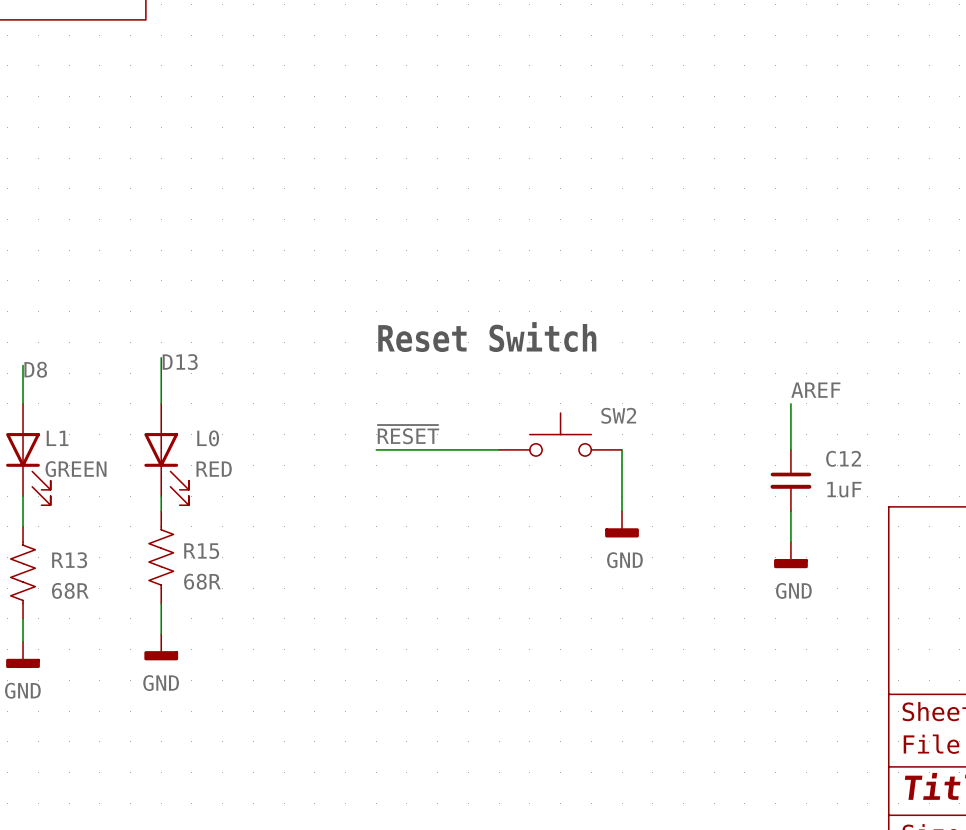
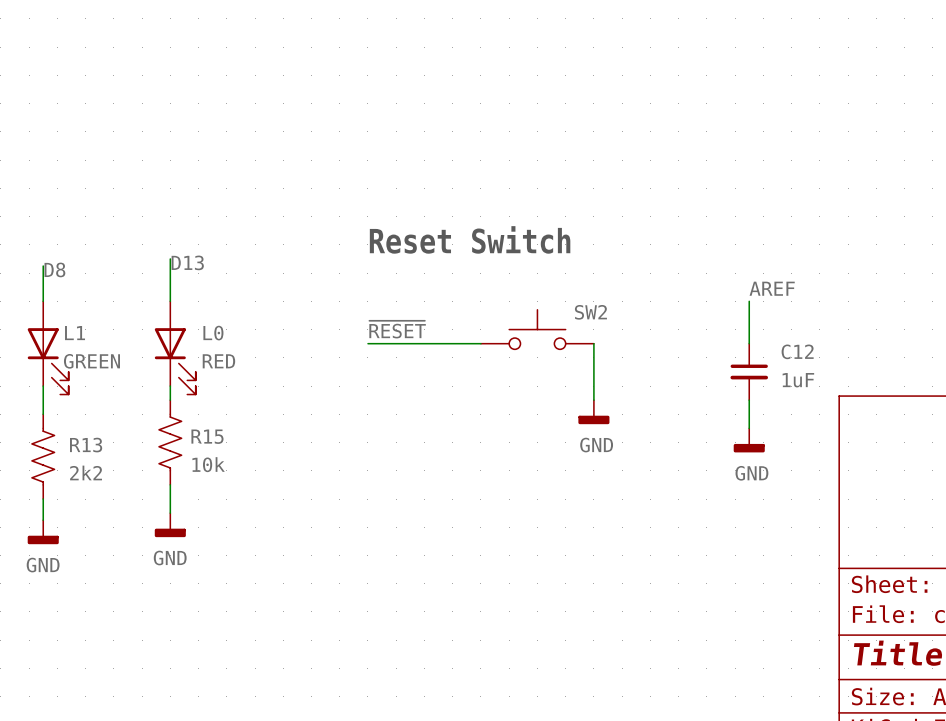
R15 value: 68R (202, 581) -> 10k (208, 464)
R13 value: 68R (70, 590) -> 2k2 (86, 472)

